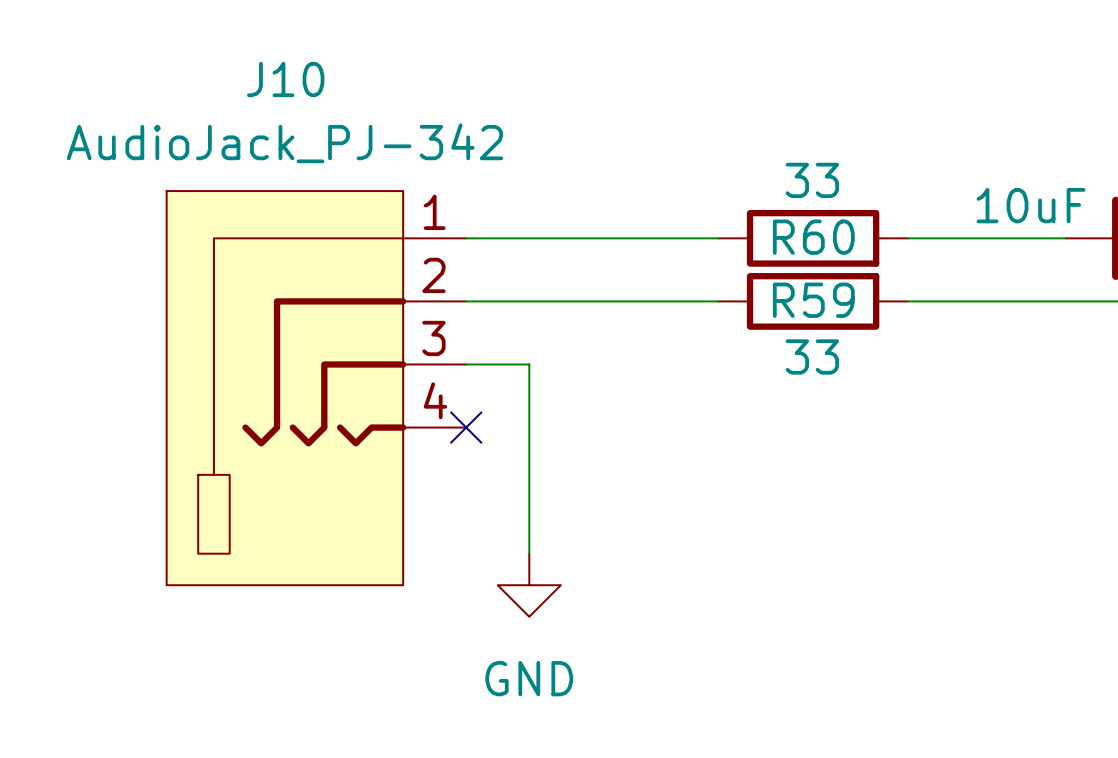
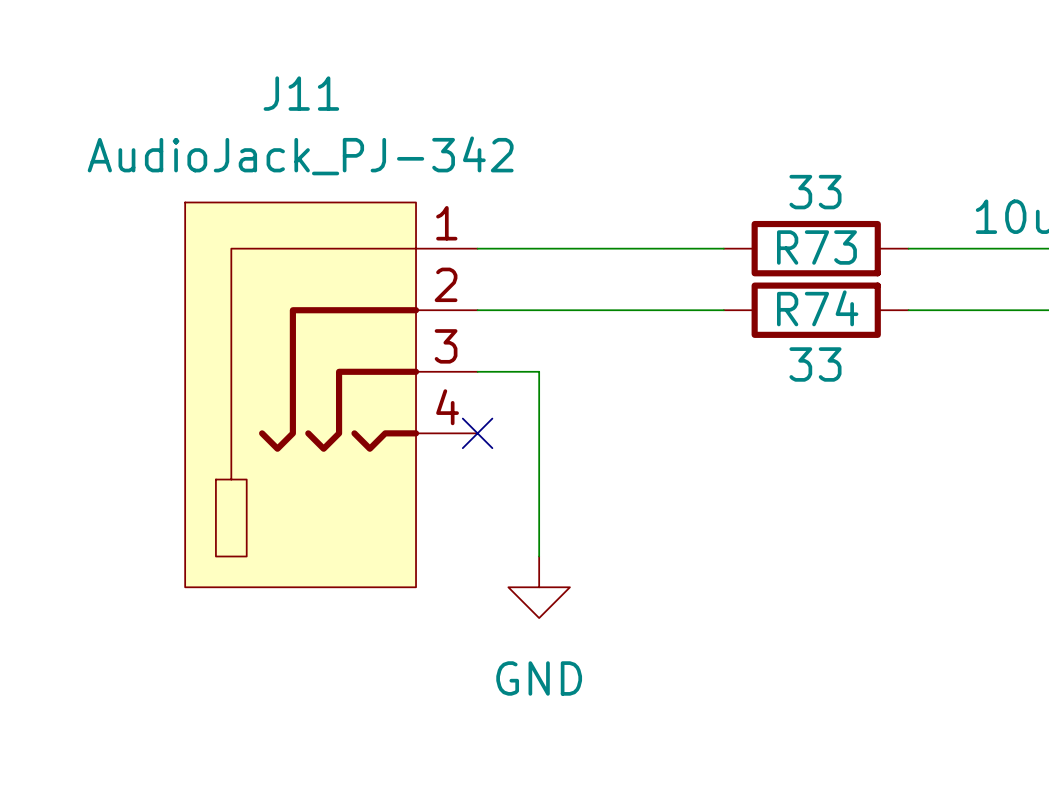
J10 name: J10 (285, 79) -> J11 (301, 93)
R60 name: R60 (813, 237) -> R73 (816, 247)
R59 name: R59 (813, 300) -> R74 (817, 308)

